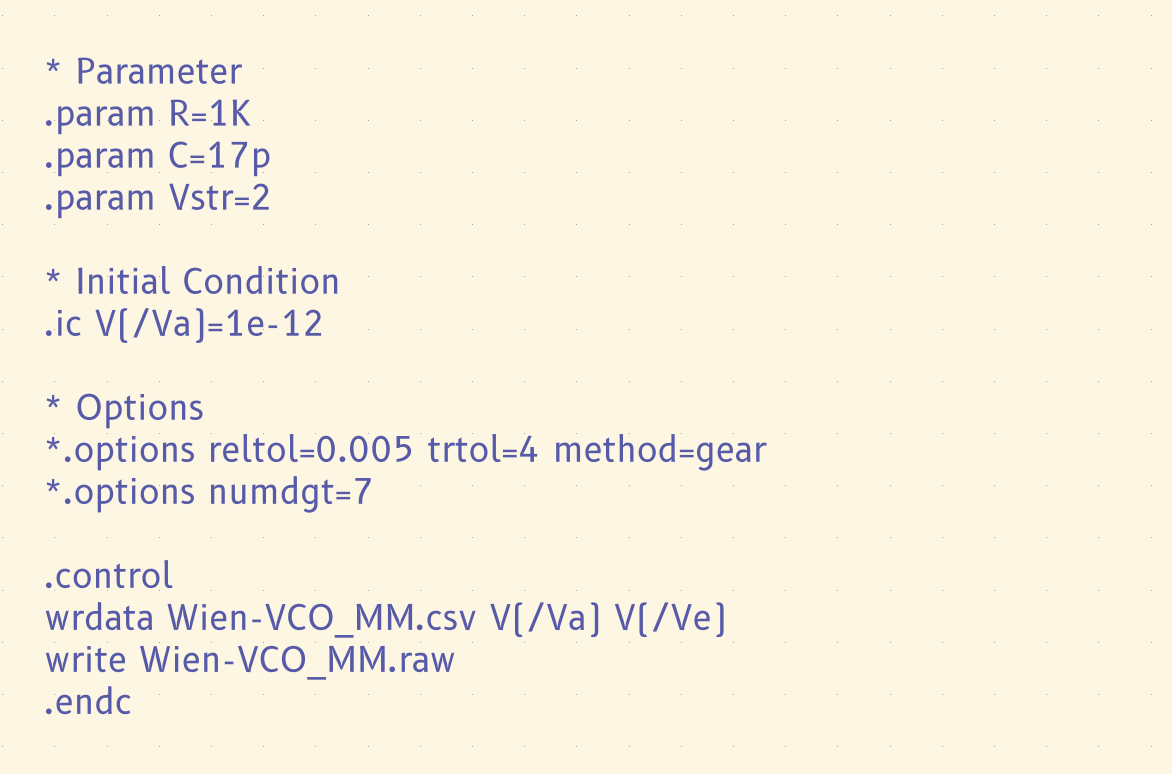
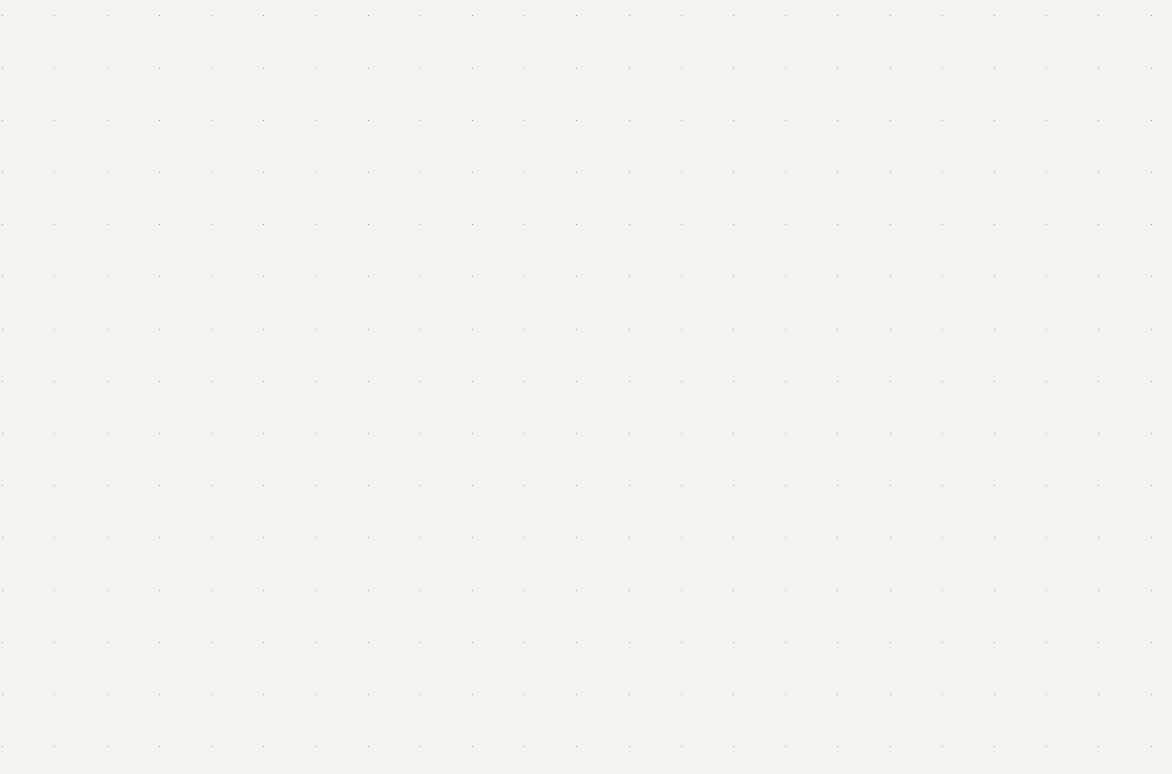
text: * Parameter (144, 70) -> none
text: .param R=1K (148, 116) -> none
text: .param C=17p (157, 158) -> none
text: .param Vstr=2 (157, 200) -> none
text: * Initial Condition (191, 279) -> none
text: .ic V(/Va)=1e-12 (183, 325) -> none
text: * Options (124, 411) -> none
text: *.options reltol=0.005 trtol=4 method=gear (406, 452) -> none
text: *.options numdgt=7 (208, 494) -> none
text: .control (109, 574) -> none
text: wrdata Wien-VCO_MM.csv V(/Va) V(/Ve) (384, 619) -> none
text: write Wien-VCO_MM.raw (250, 662) -> none
text: .endc (88, 700) -> none

